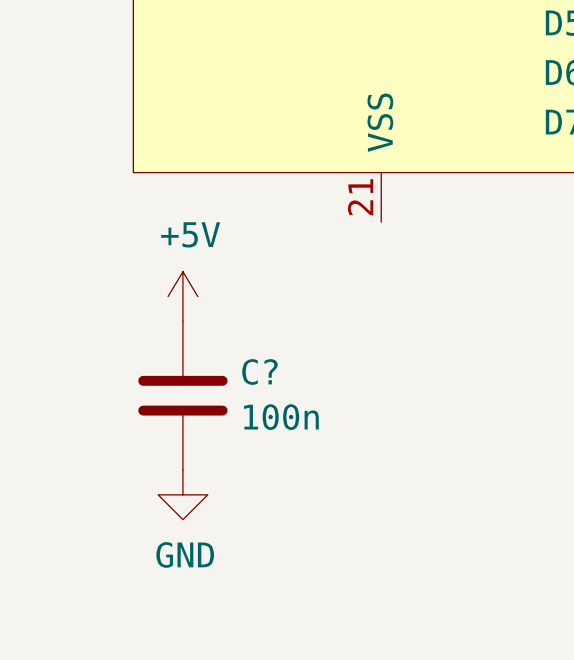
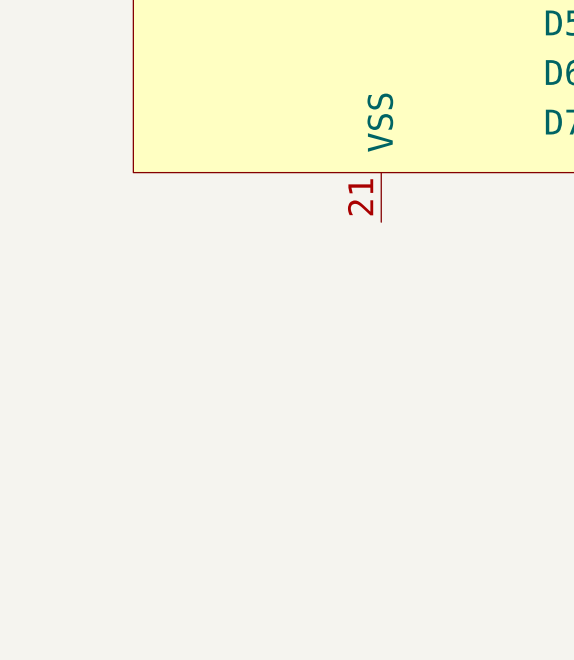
power symbol: +5V (182, 296) -> none
C?: 100n (182, 395) -> none
power symbol: GND (182, 494) -> none

